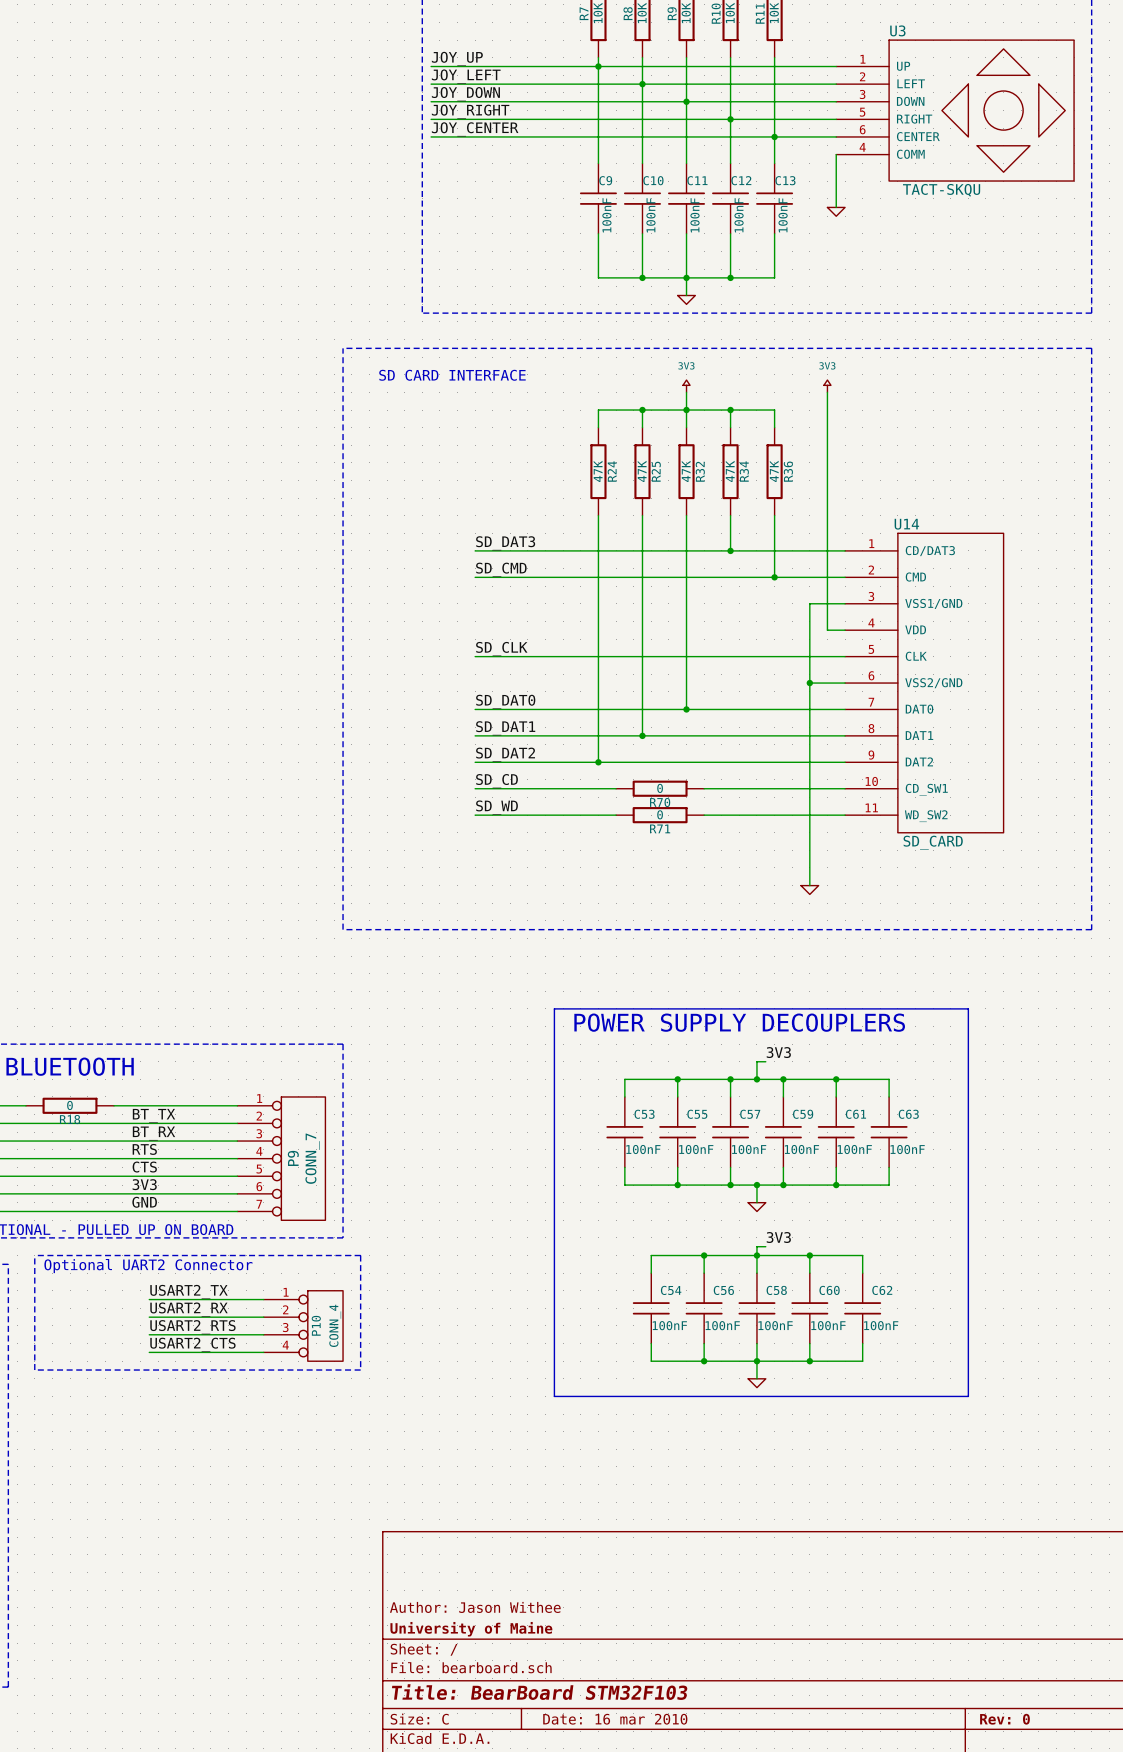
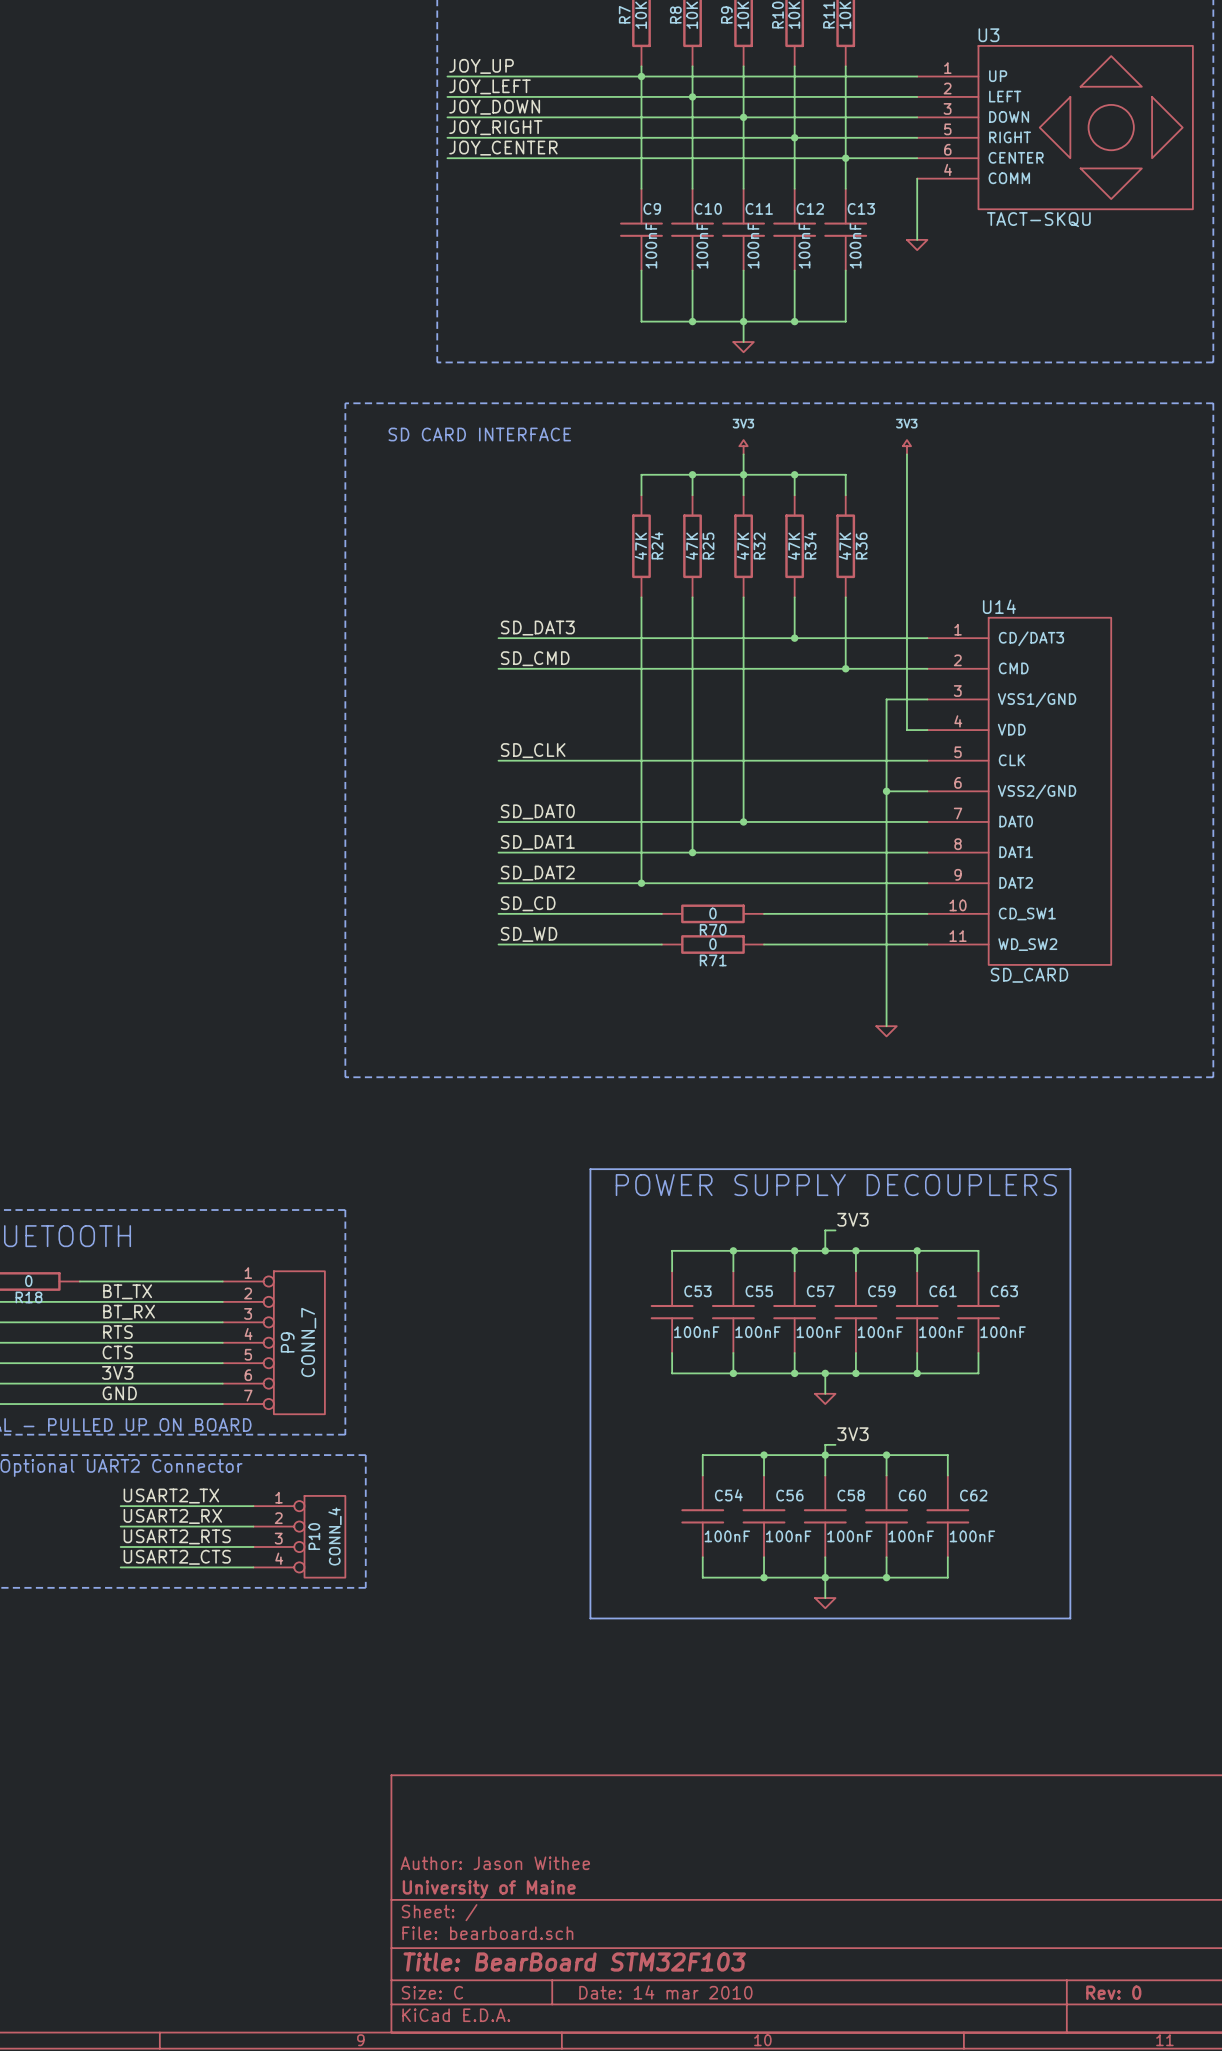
title block: Date: 16 mar 2010 (615, 1719) -> Date: 14 mar 2010 (665, 1992)

